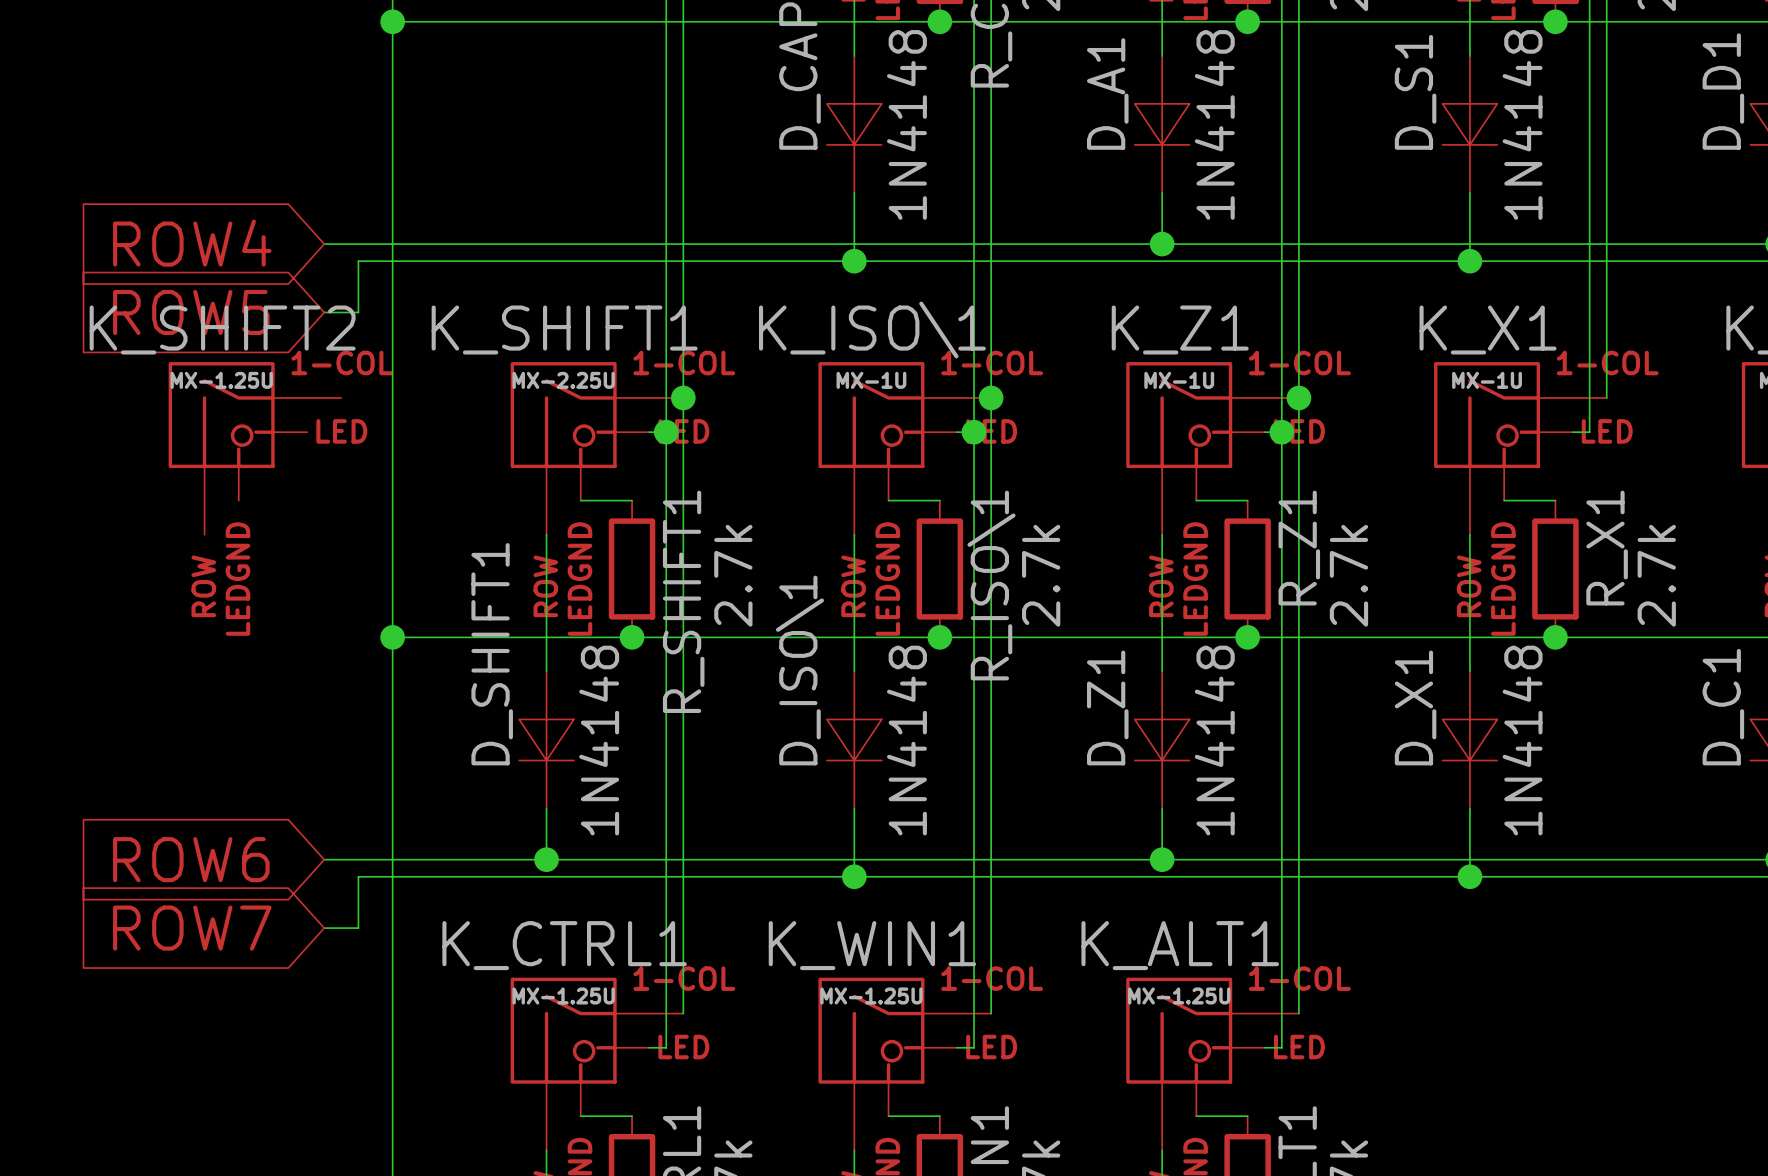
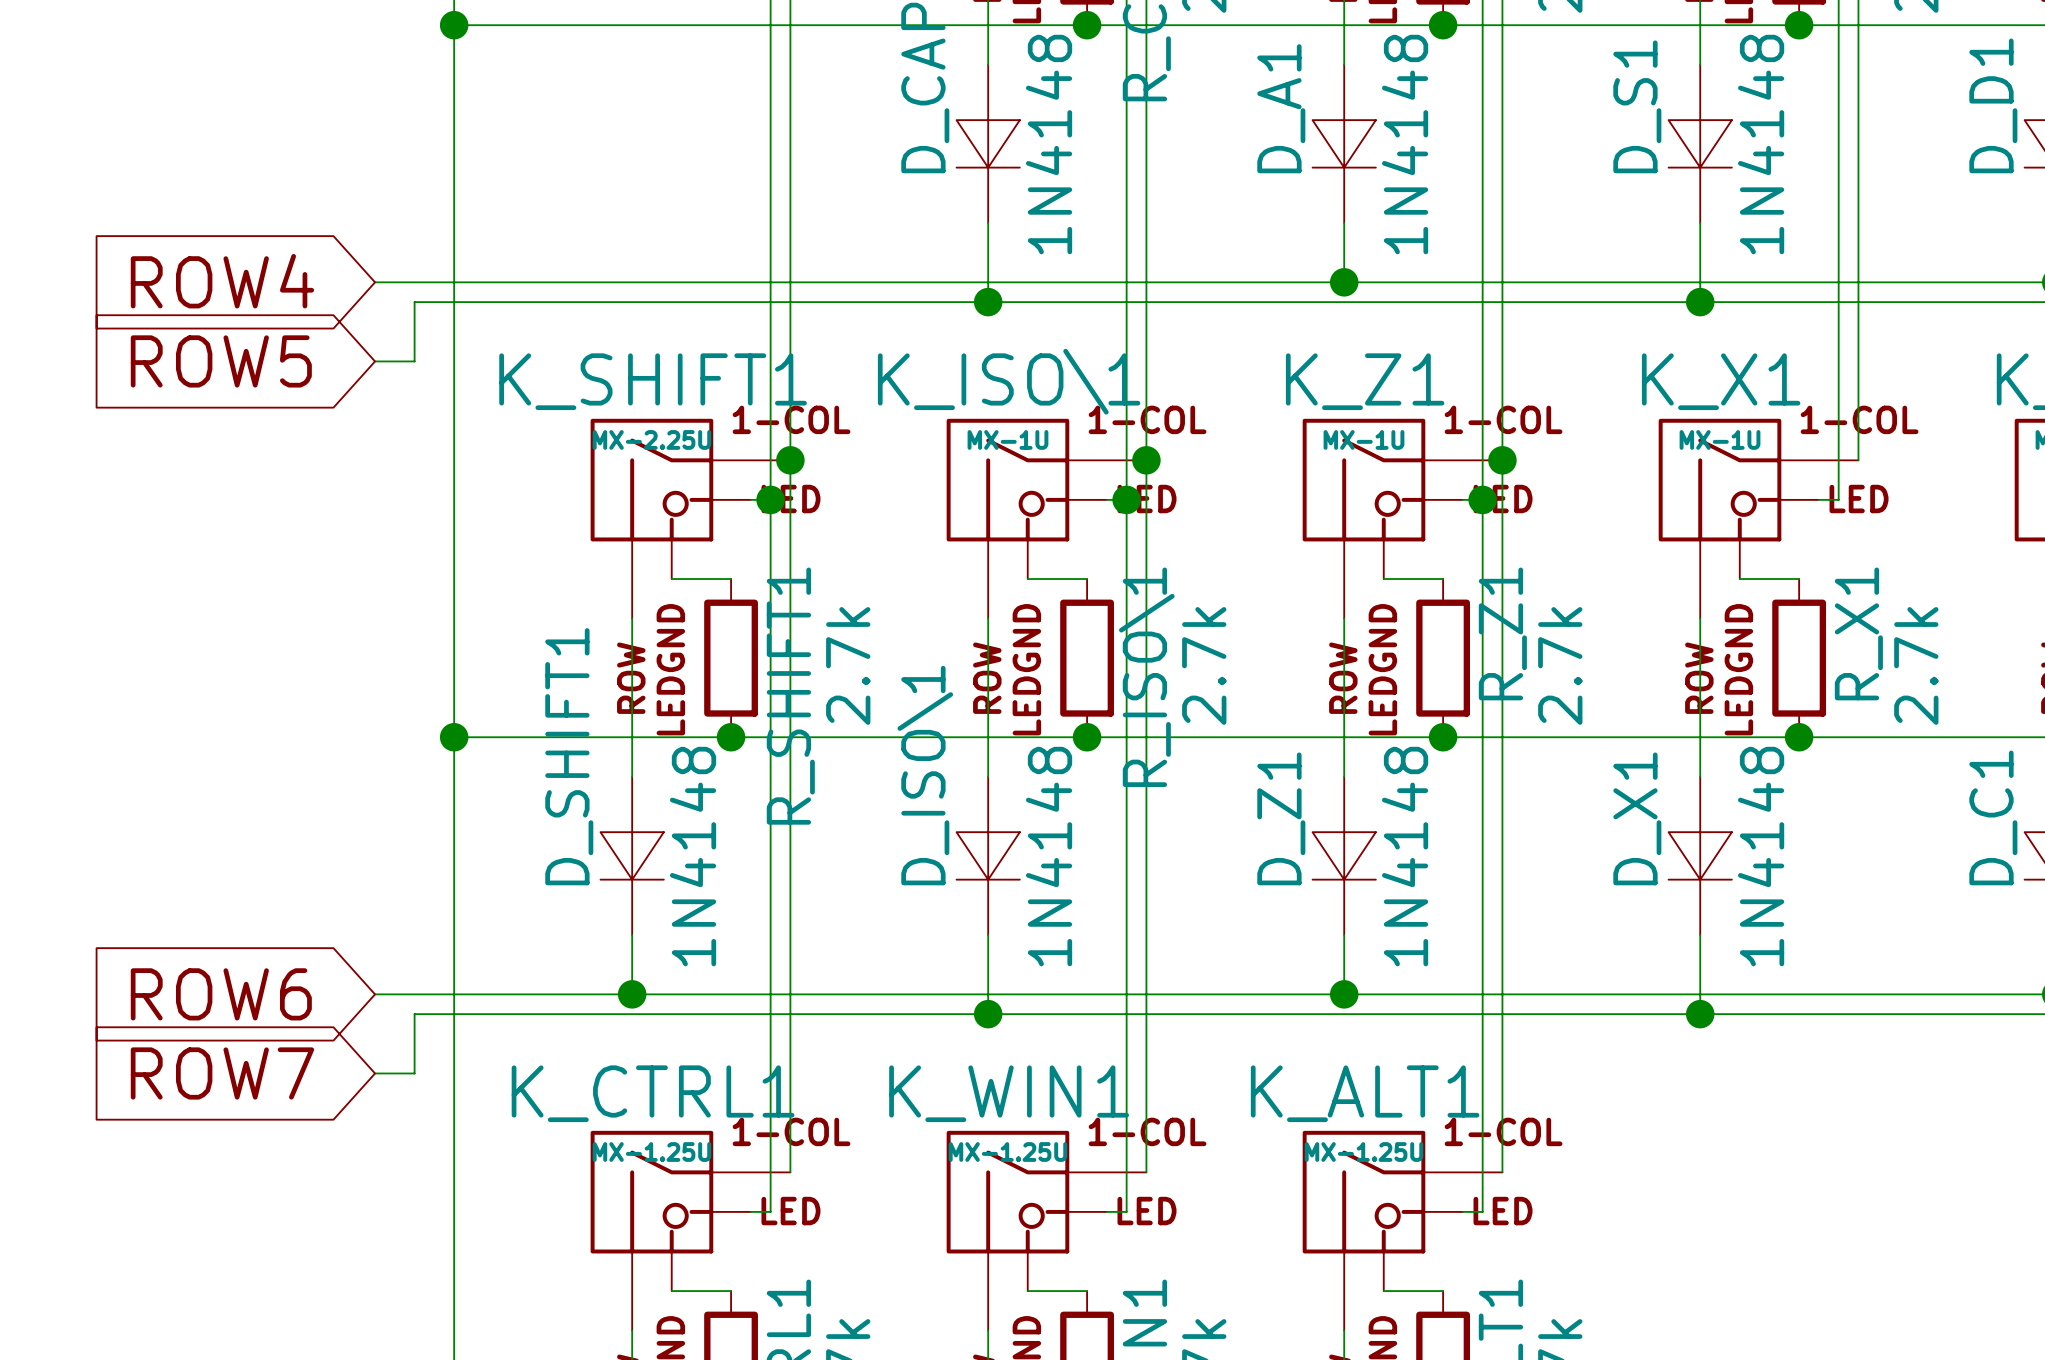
K_SHIFT2: MX-1.25U (254, 448) -> none

